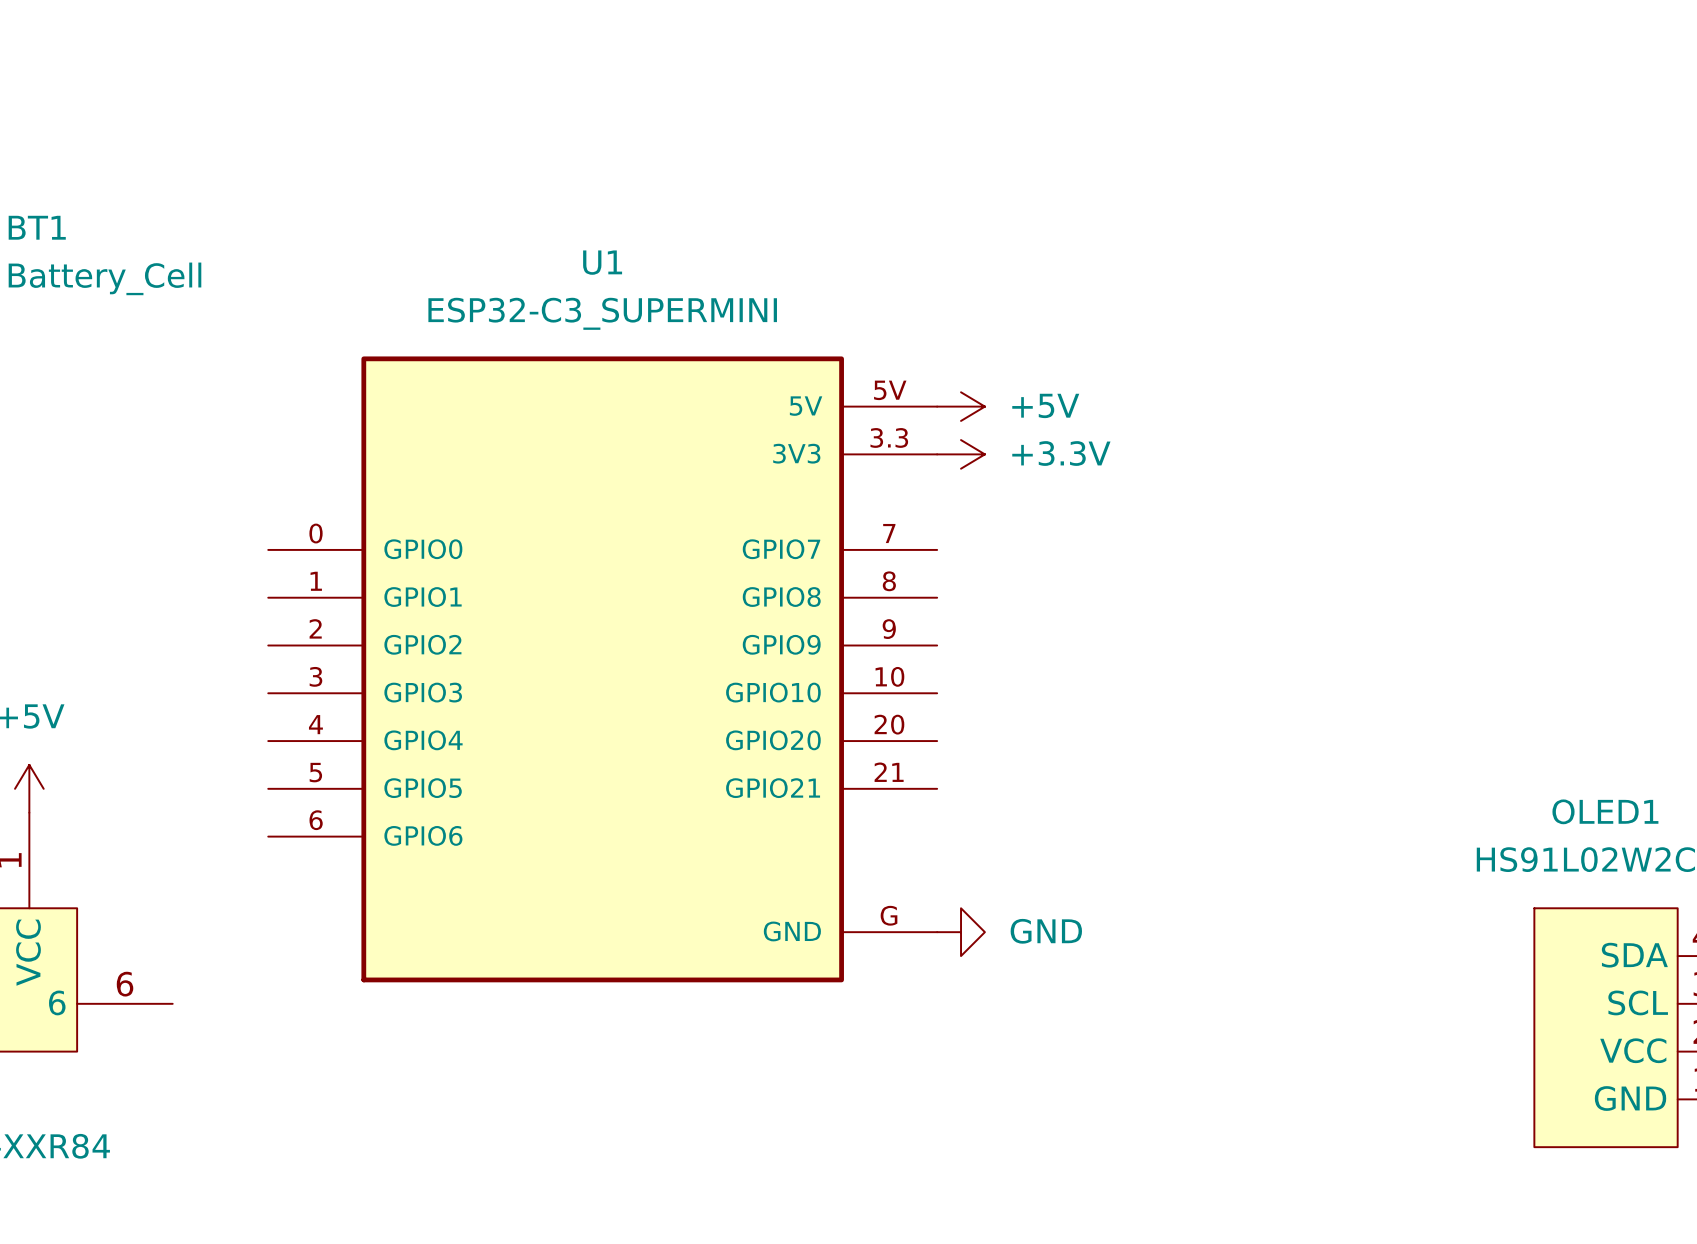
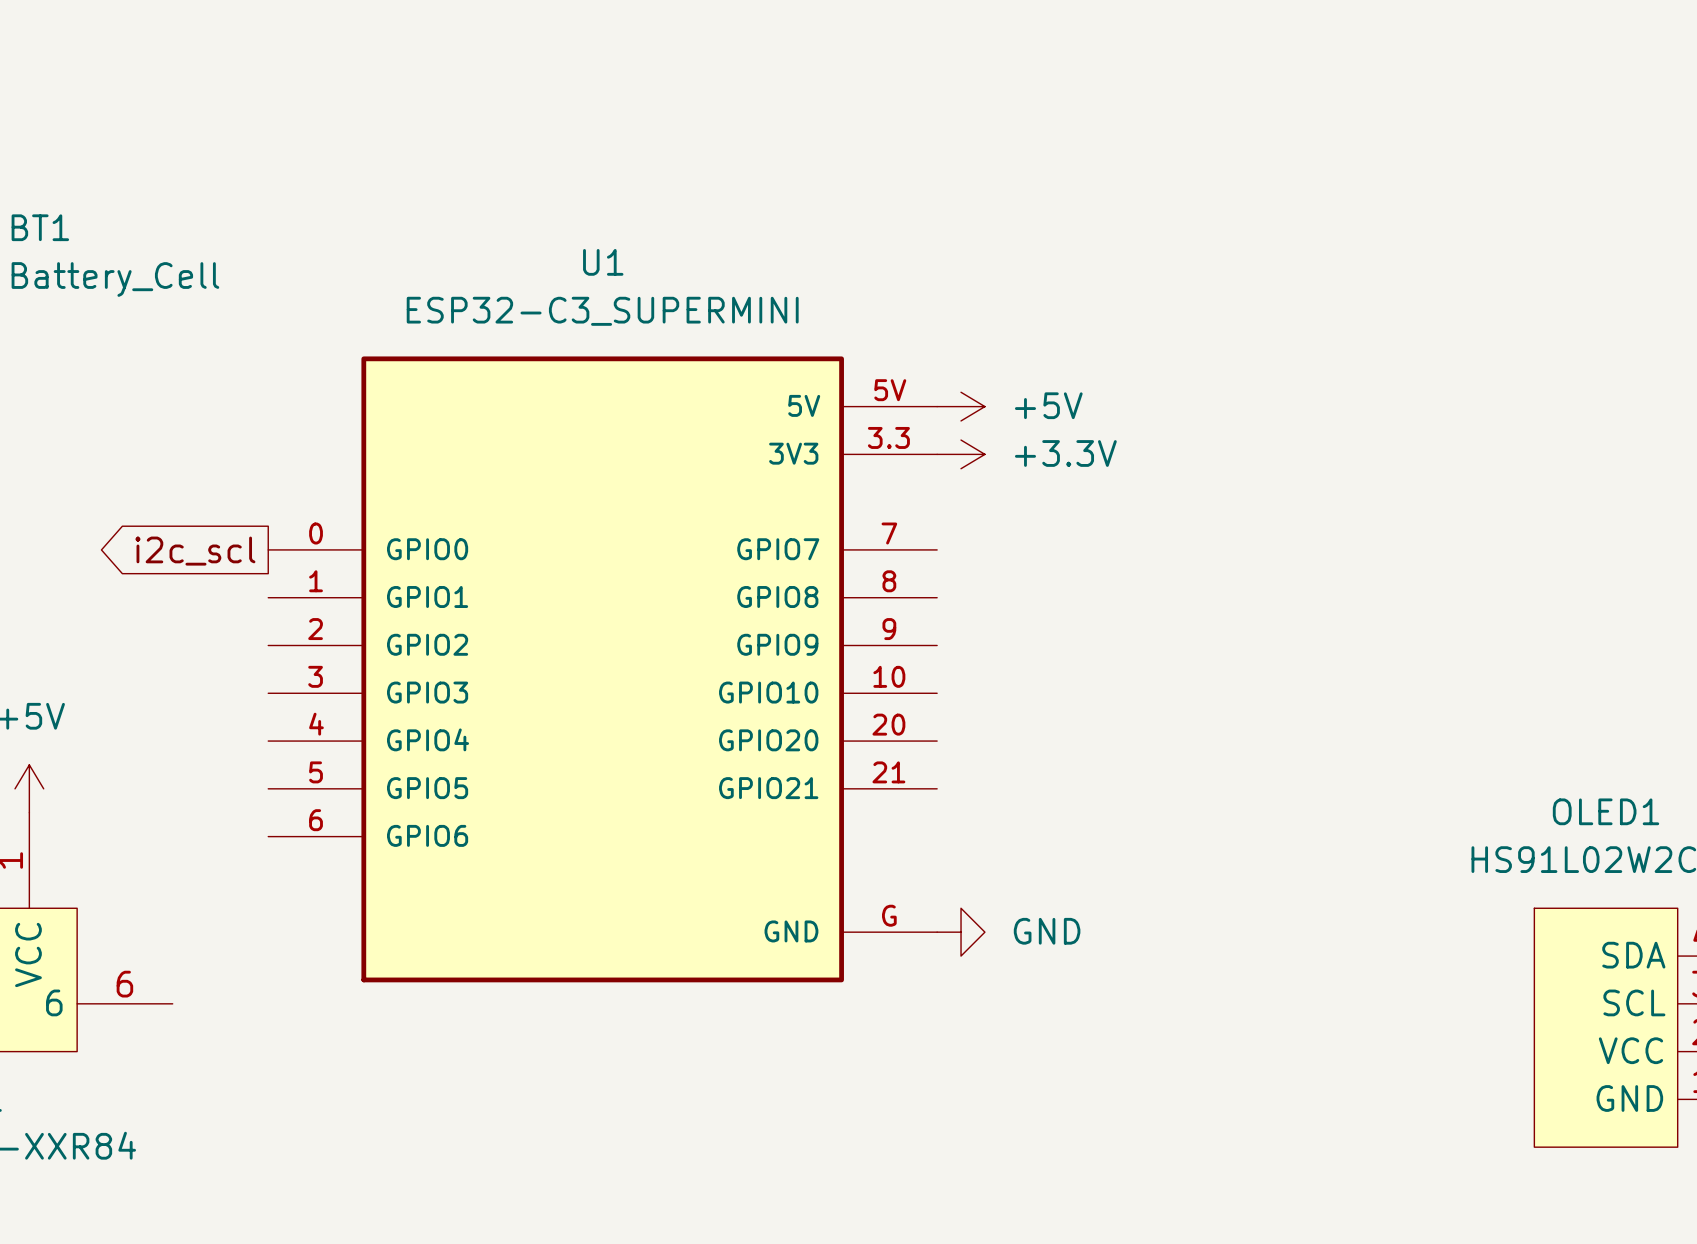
global label: none -> i2c_scl (195, 551)

